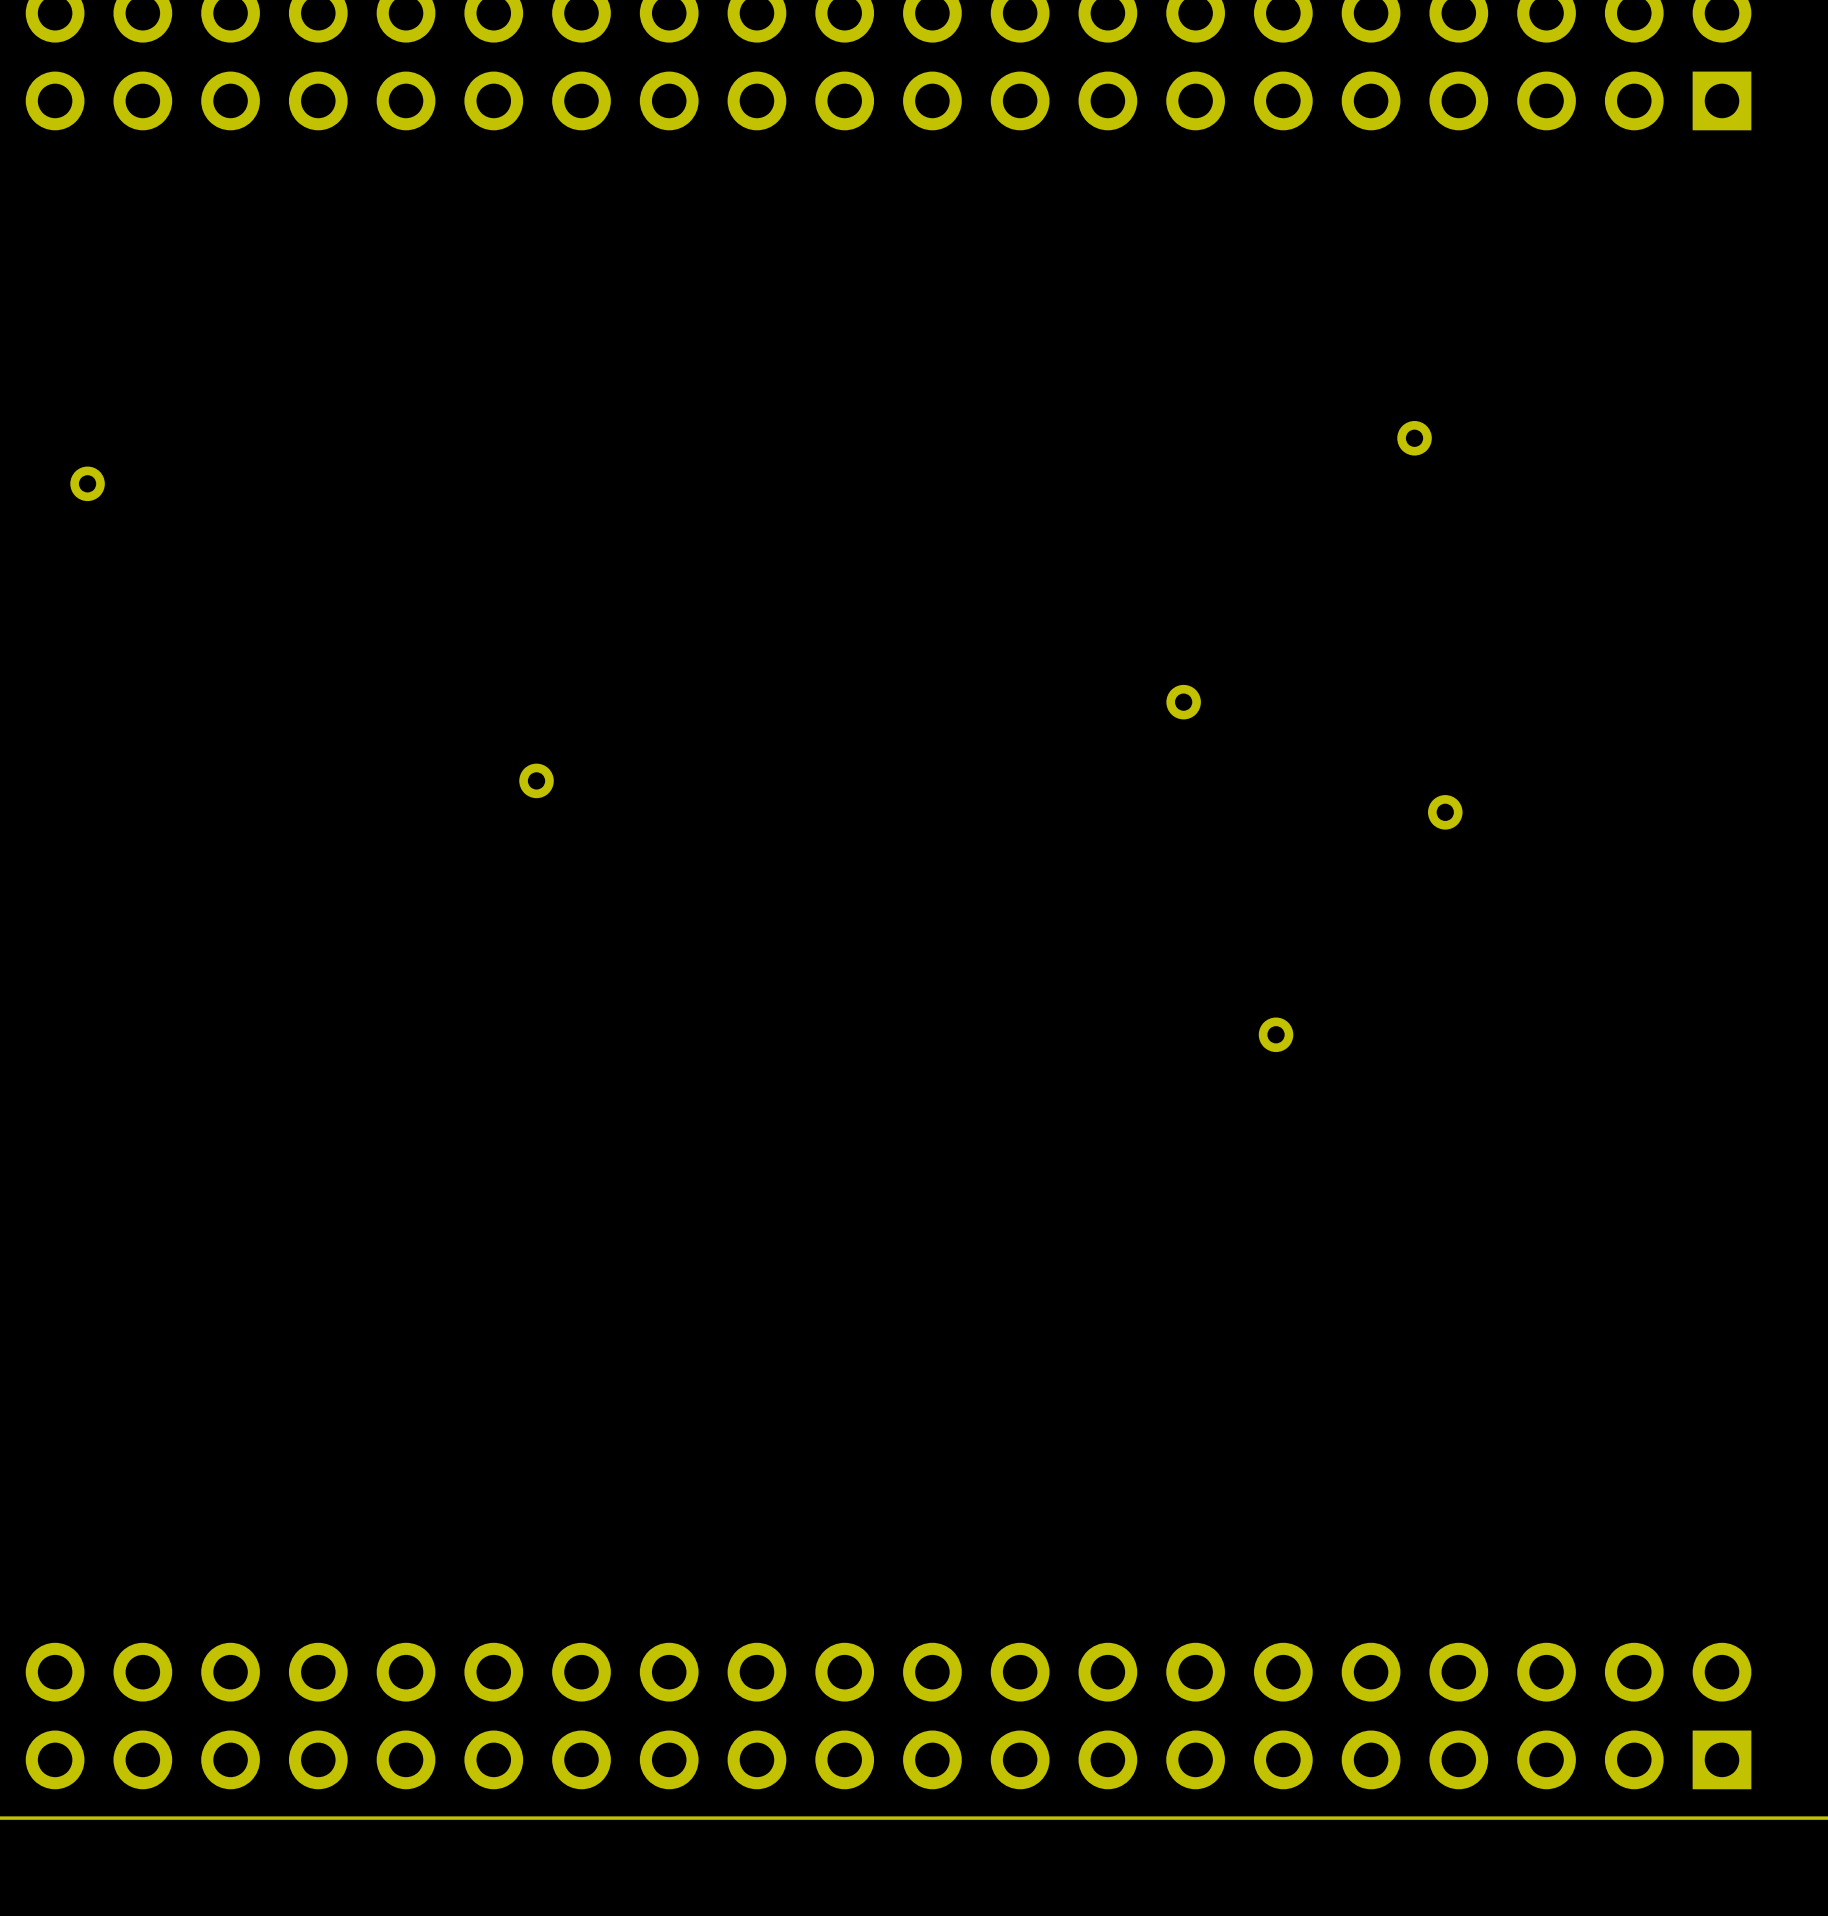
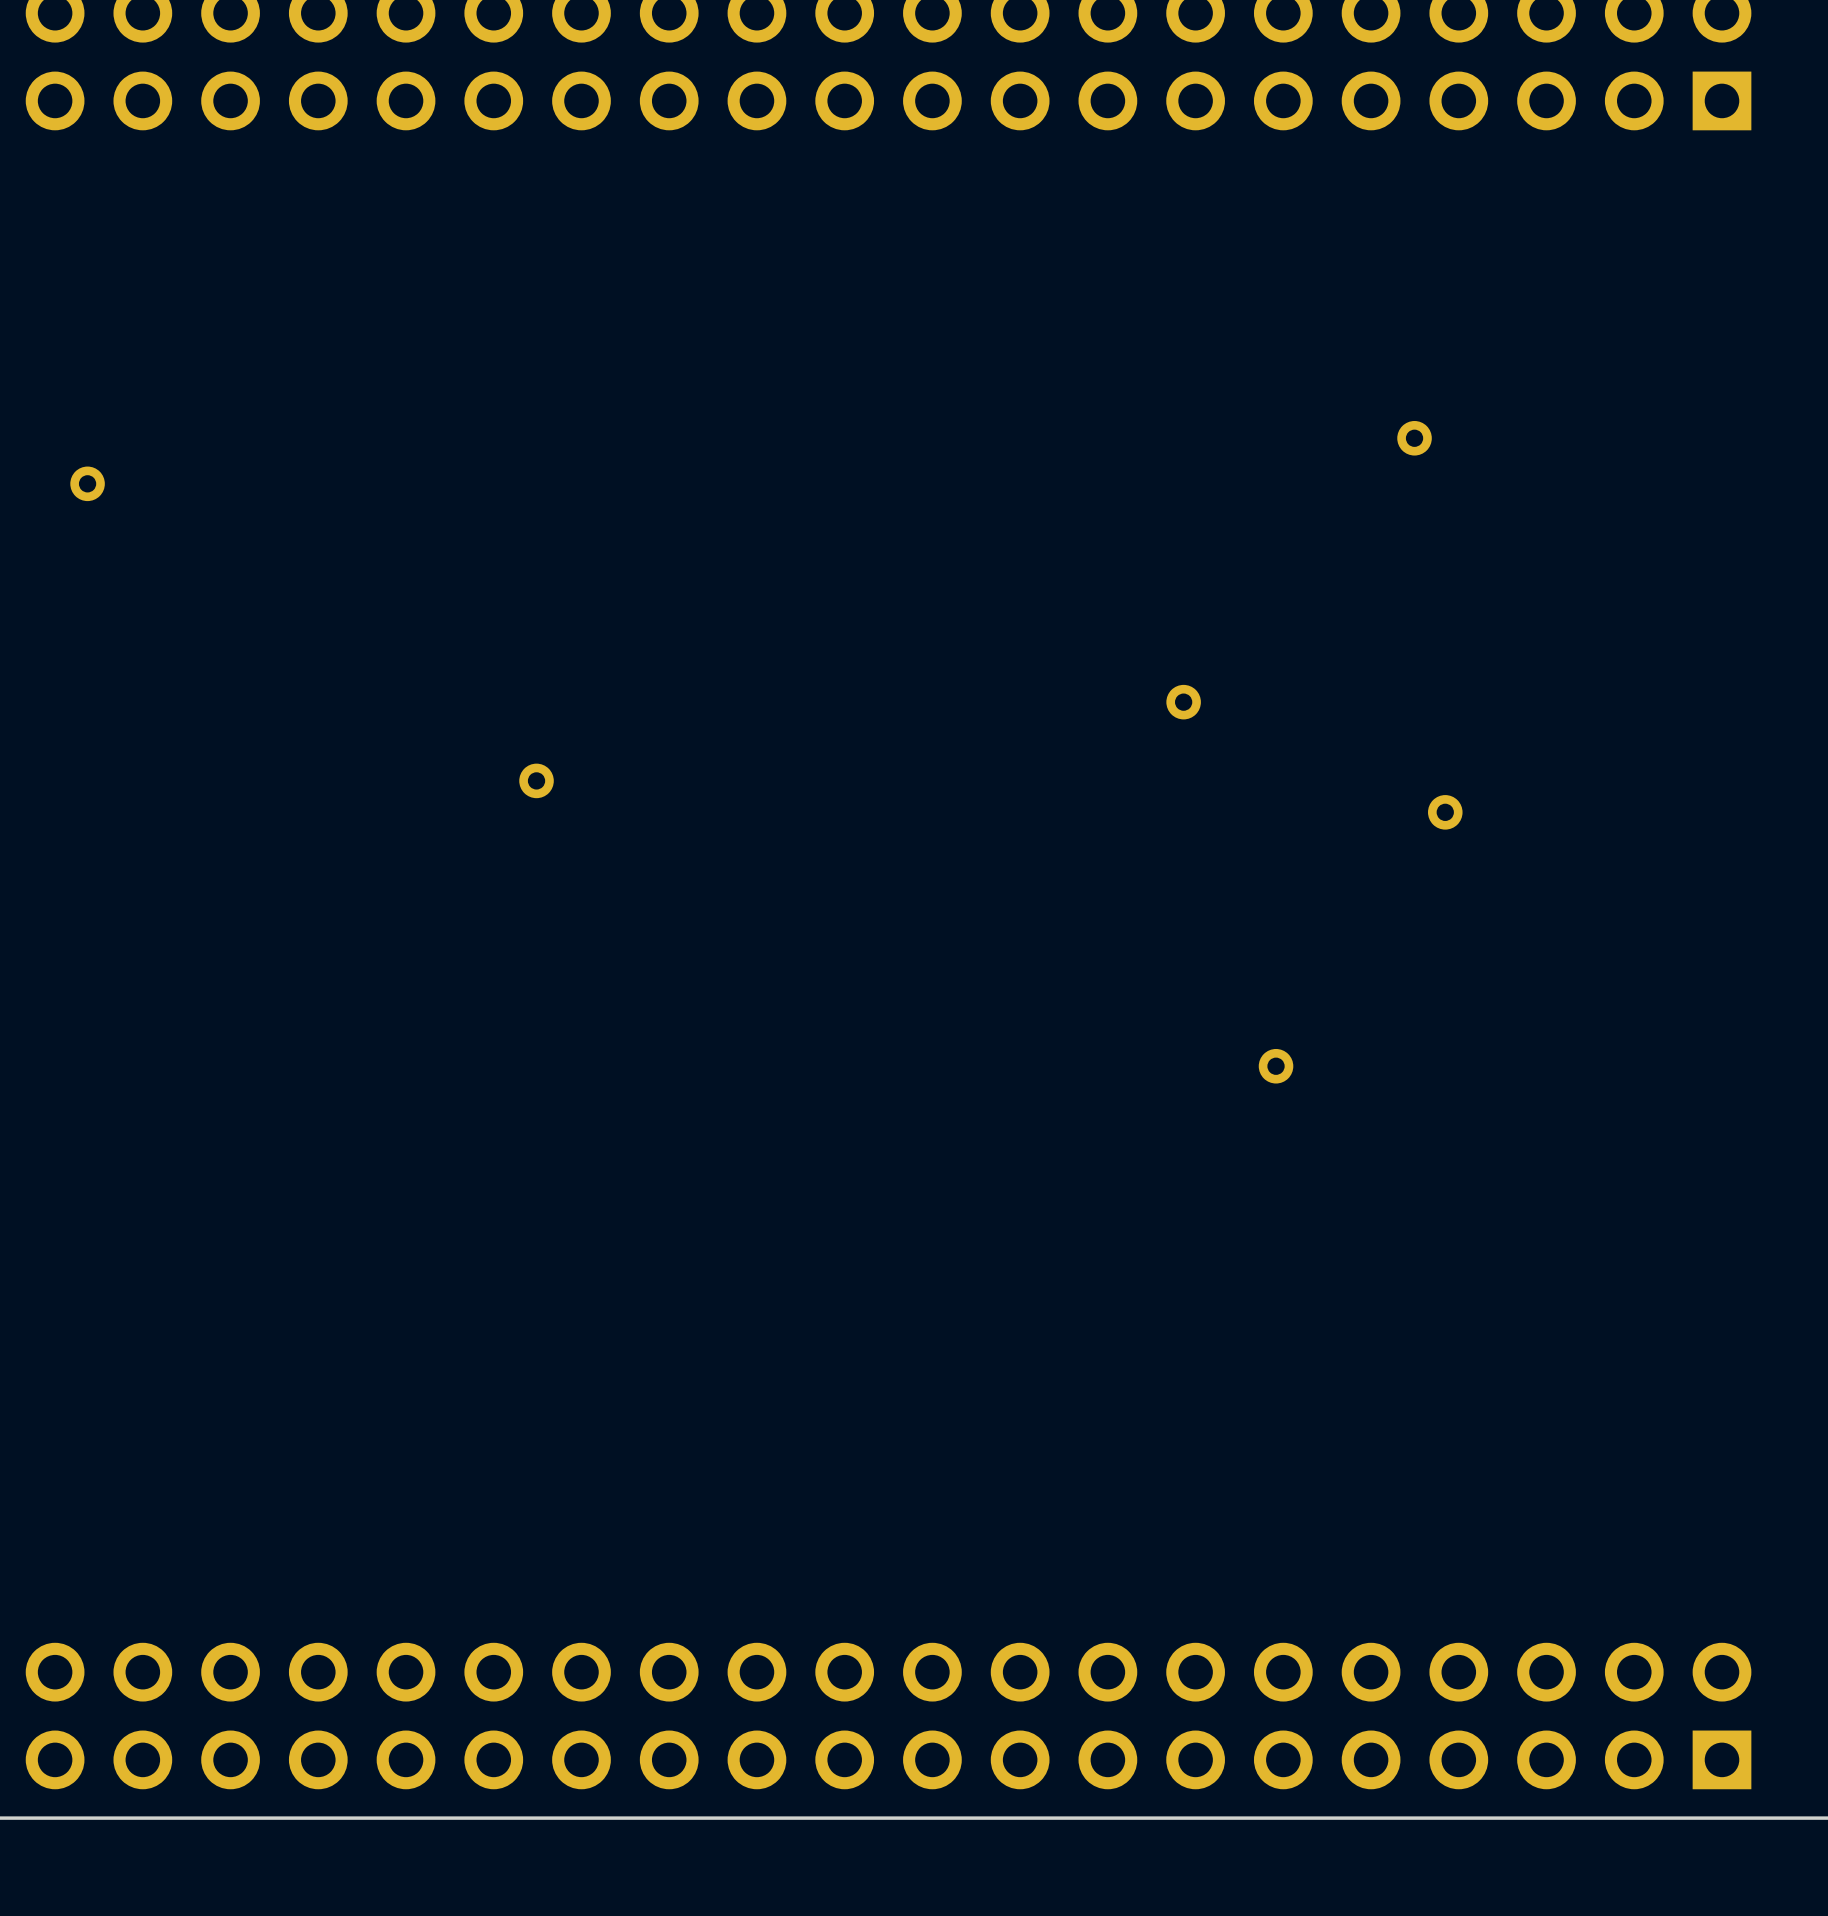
part position: (1276, 1034) -> (1276, 1066)

